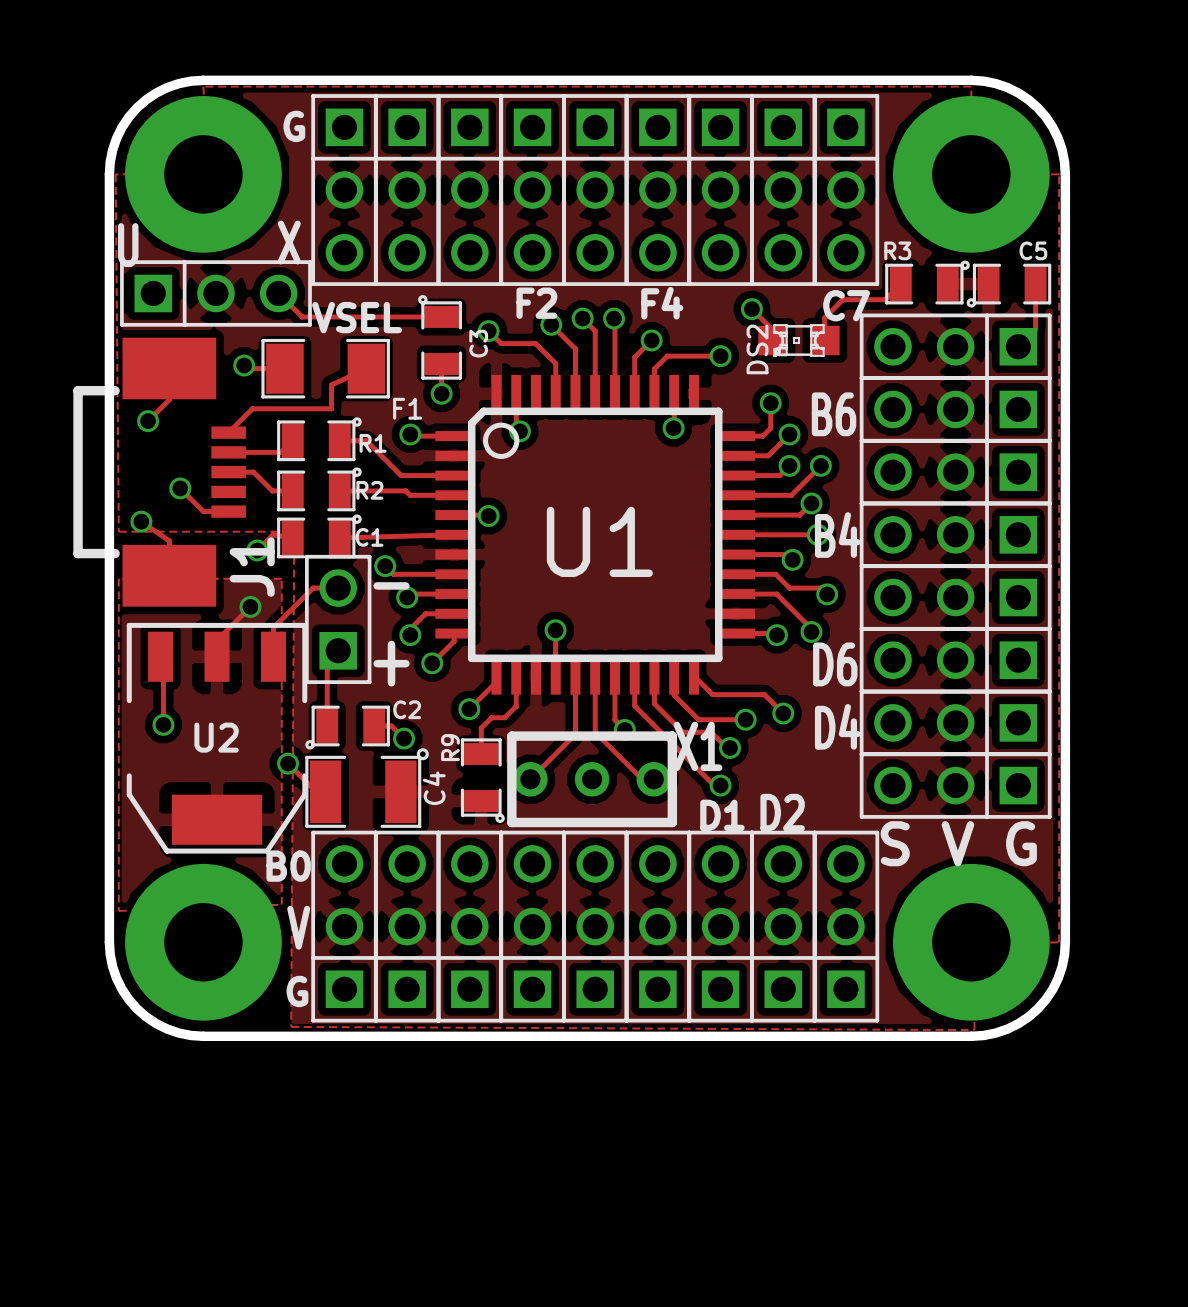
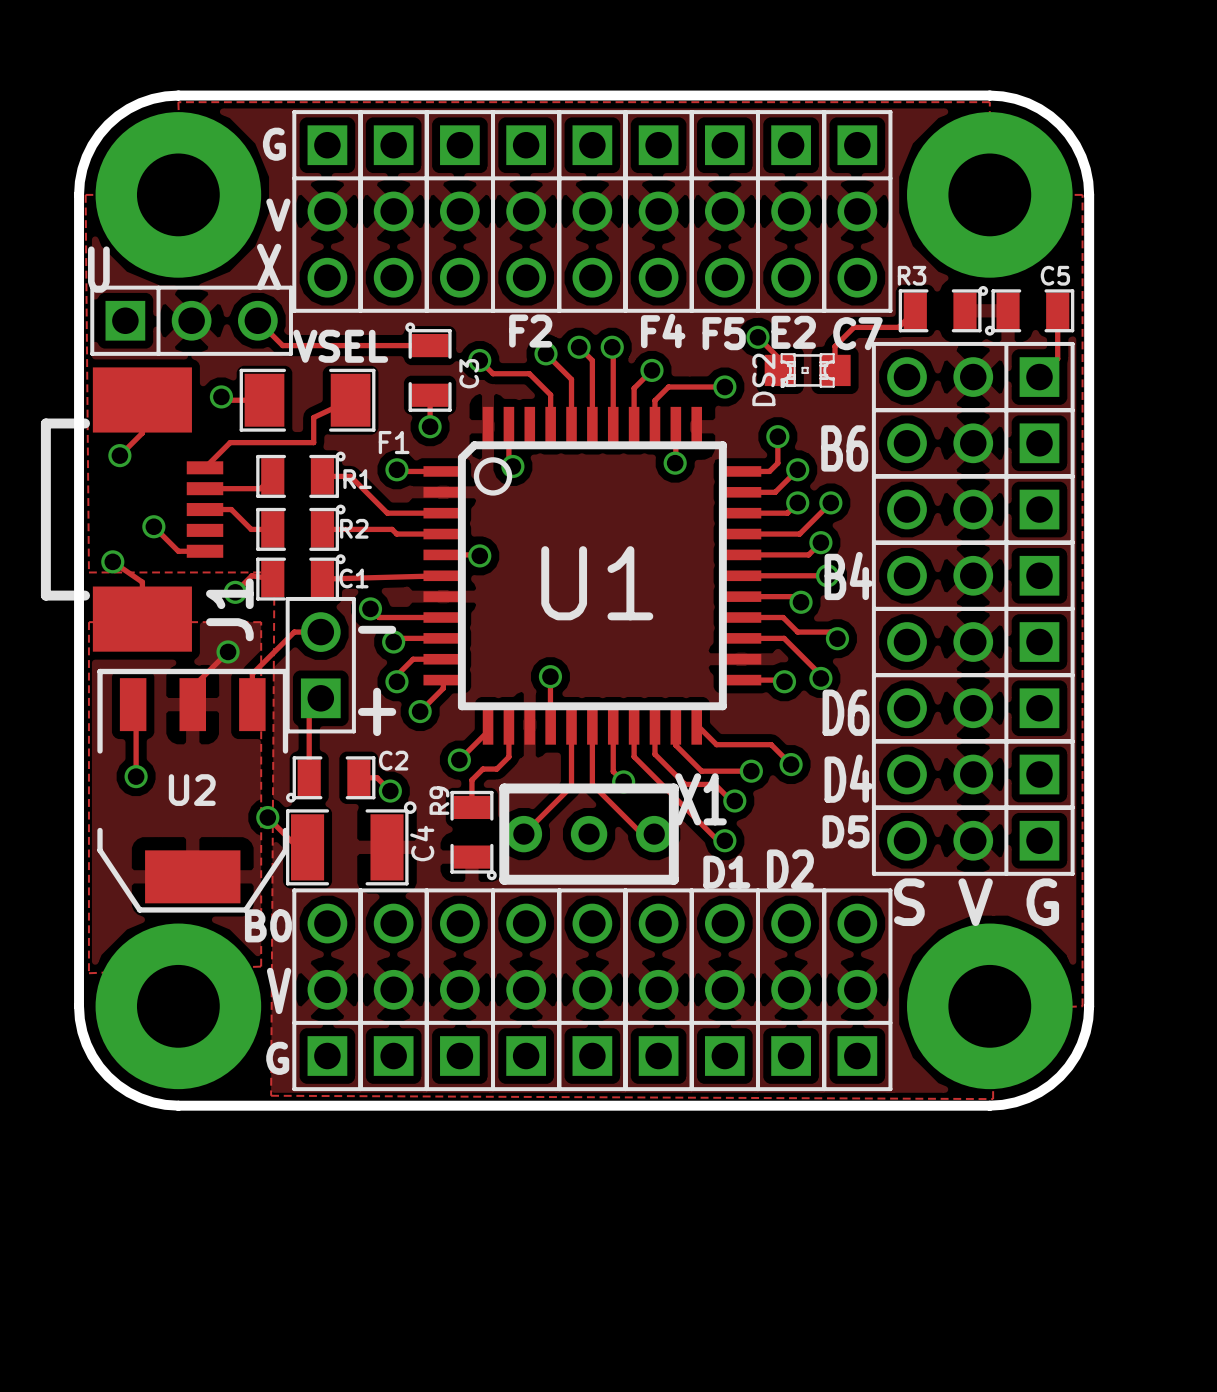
text: none -> V (278, 215)
text: none -> E2 (793, 332)
text: none -> F5 (724, 333)
text: none -> D5 (846, 831)

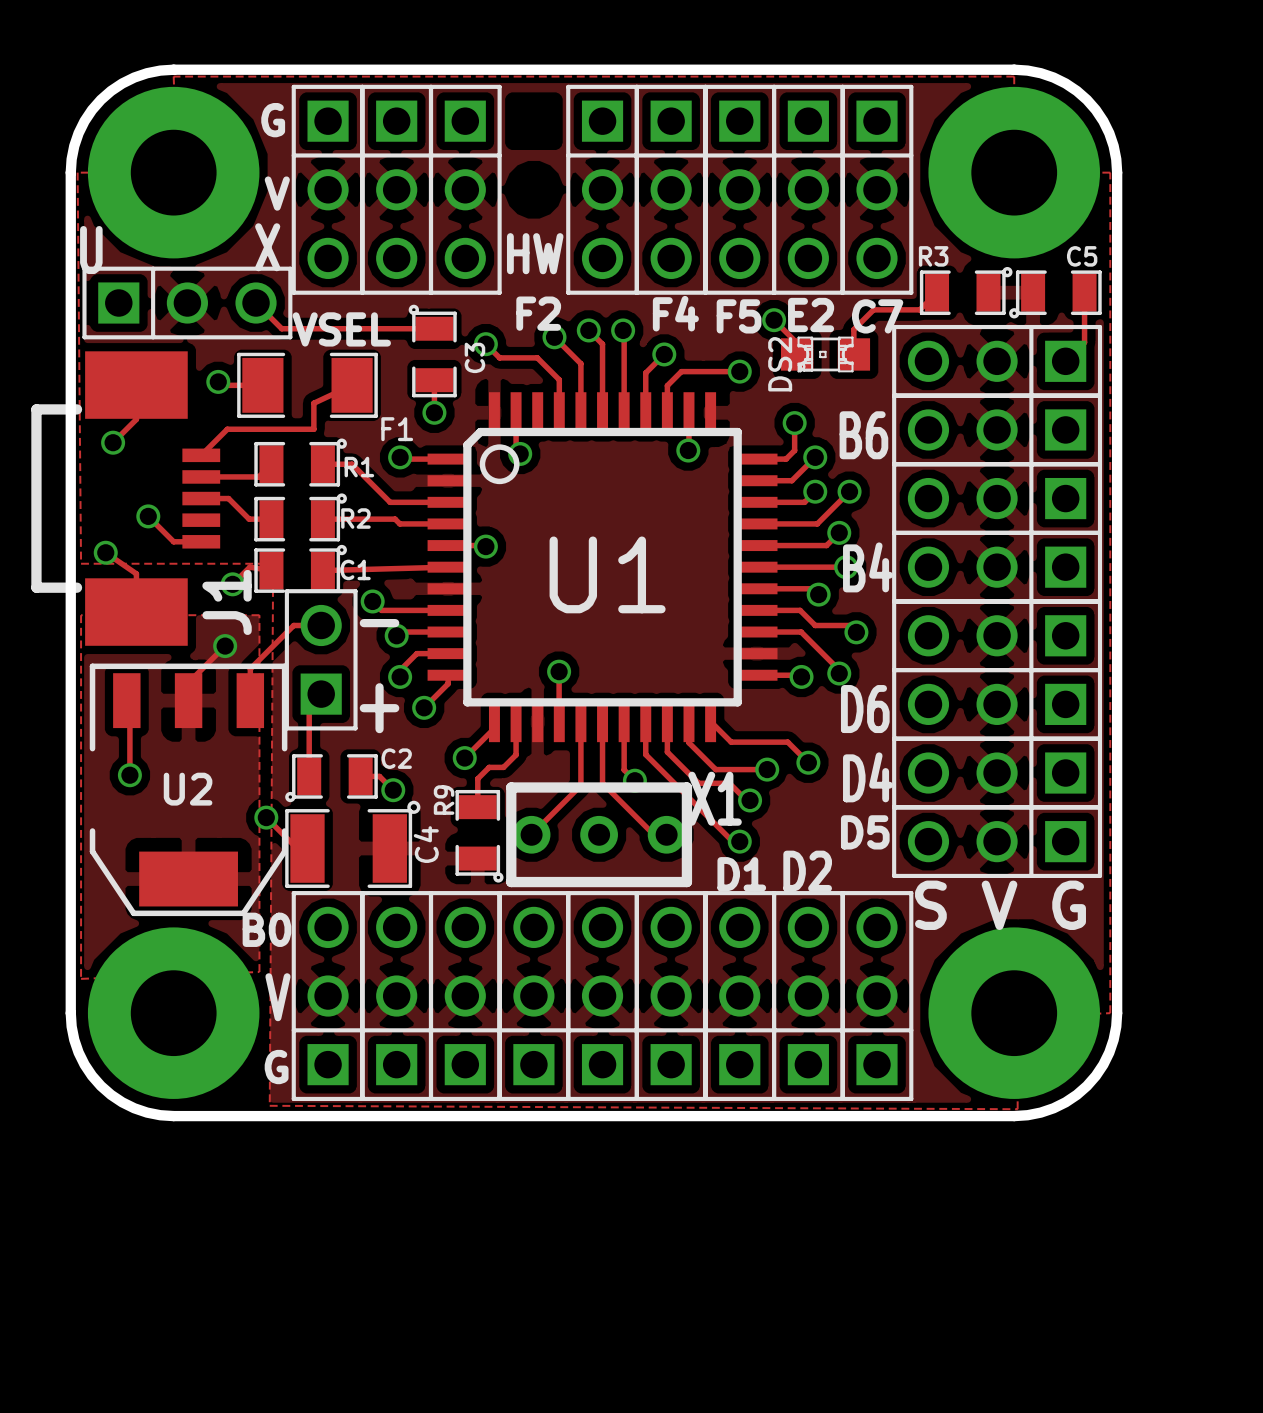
part: (526, 211) -> none
text: none -> HW (535, 253)

